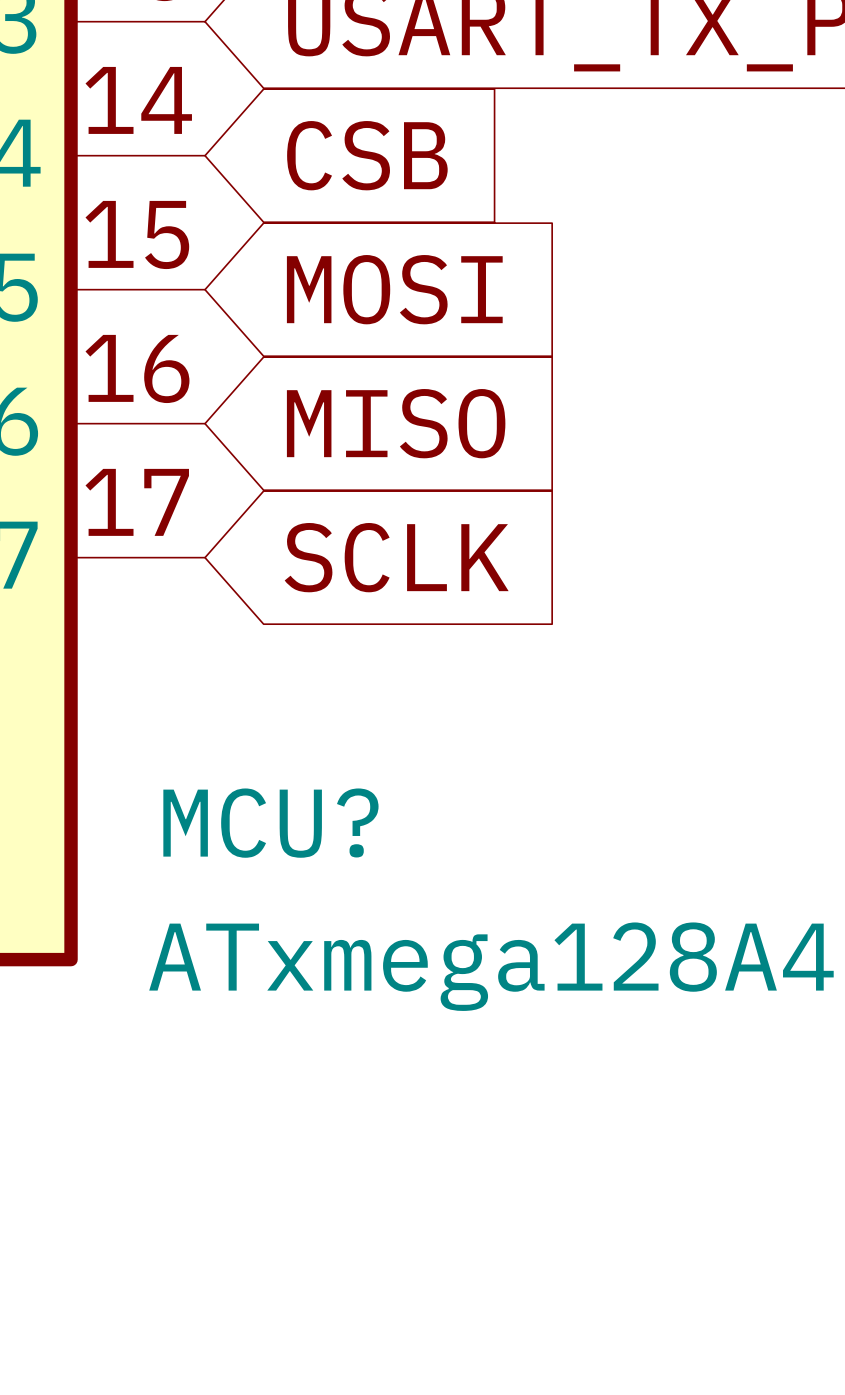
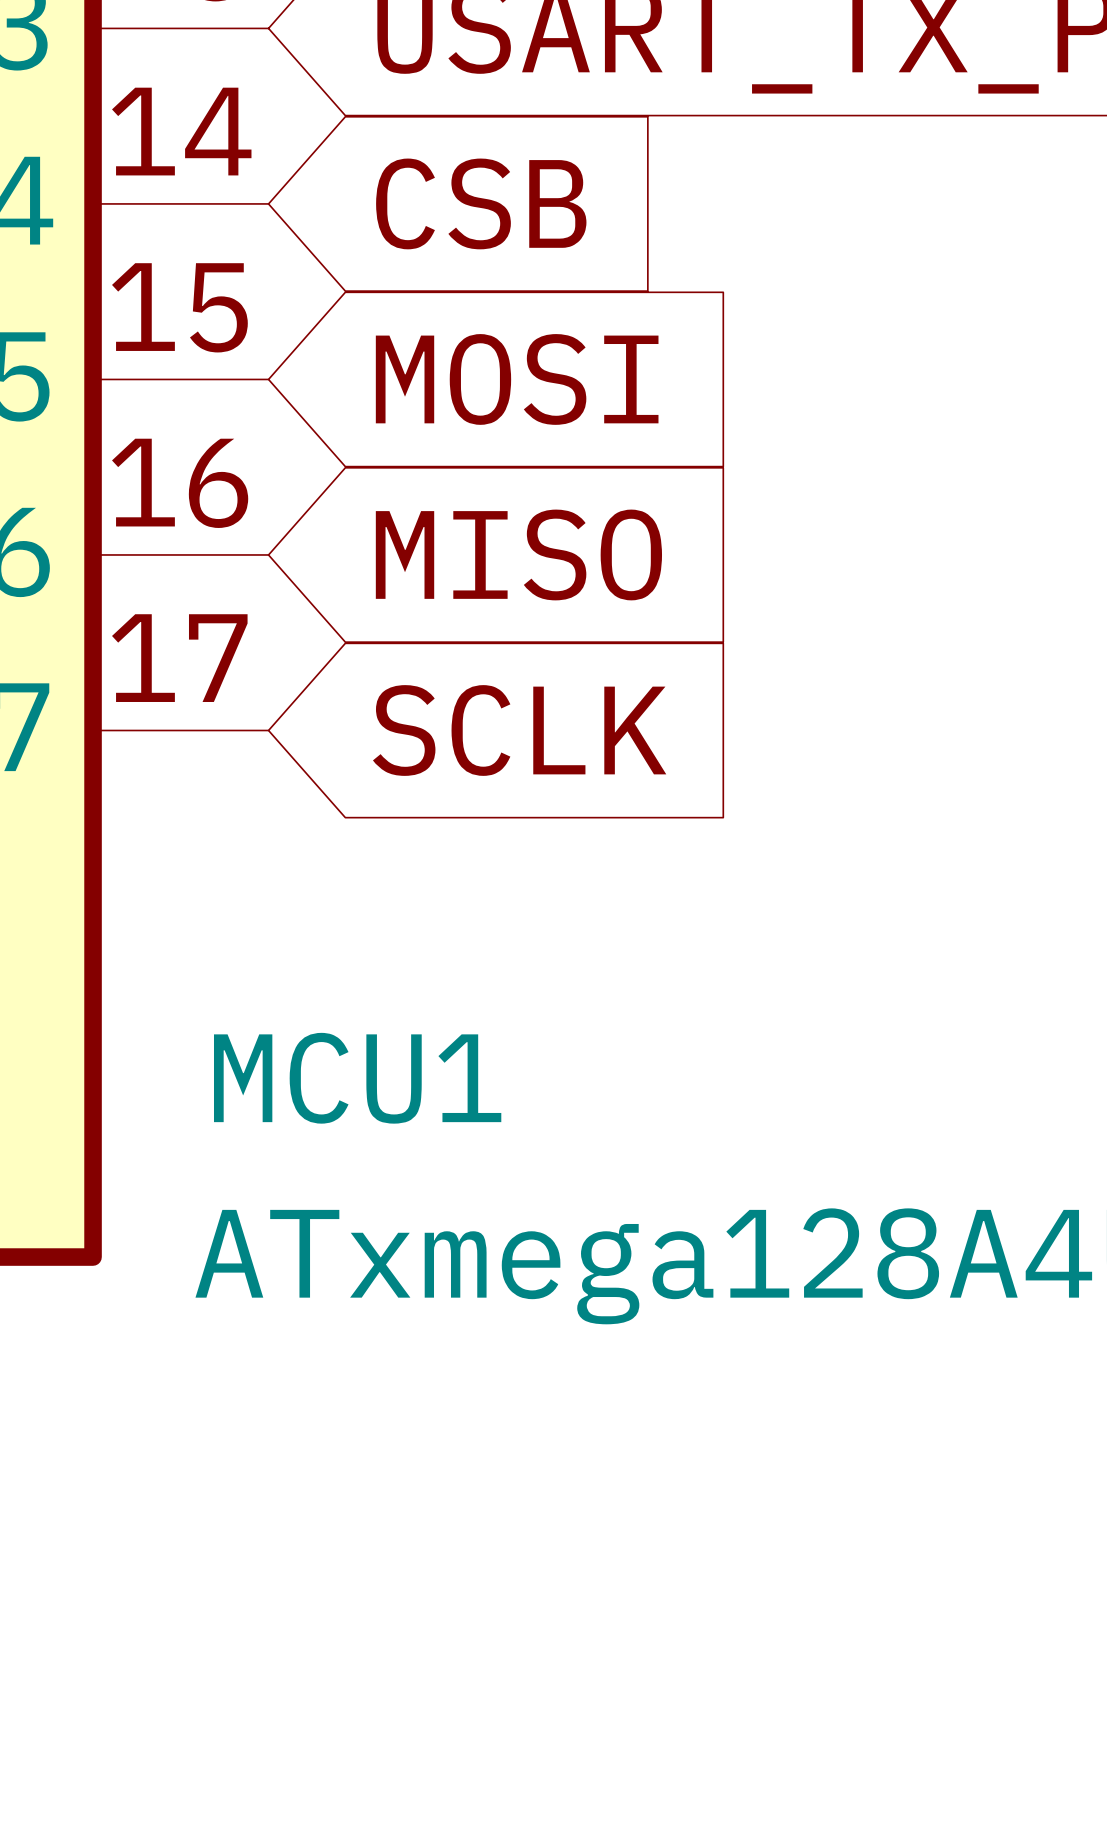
MCU? name: MCU? (270, 823) -> MCU1 (357, 1078)

